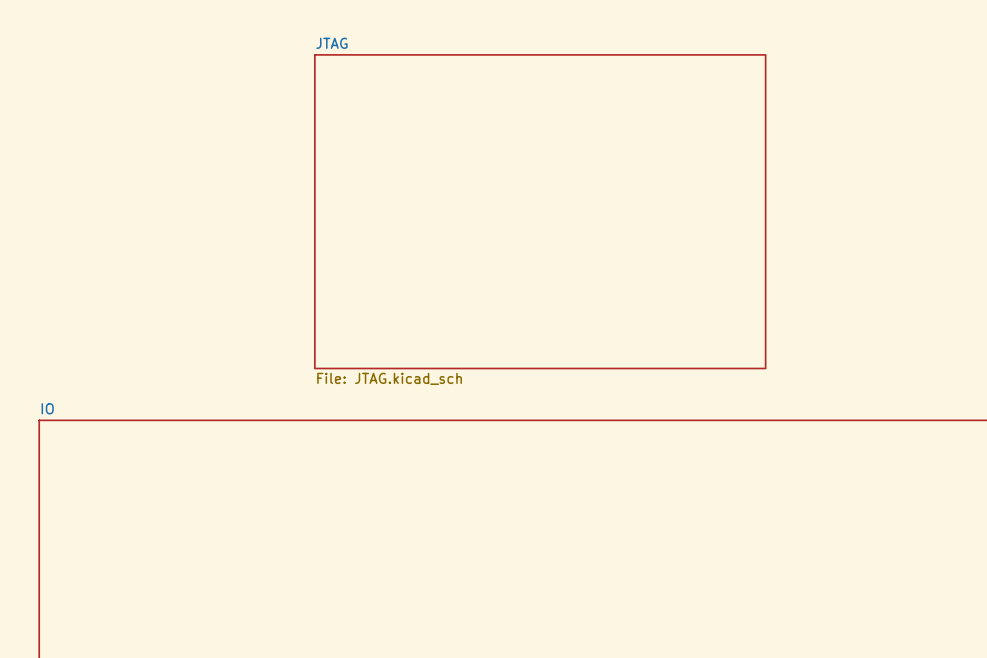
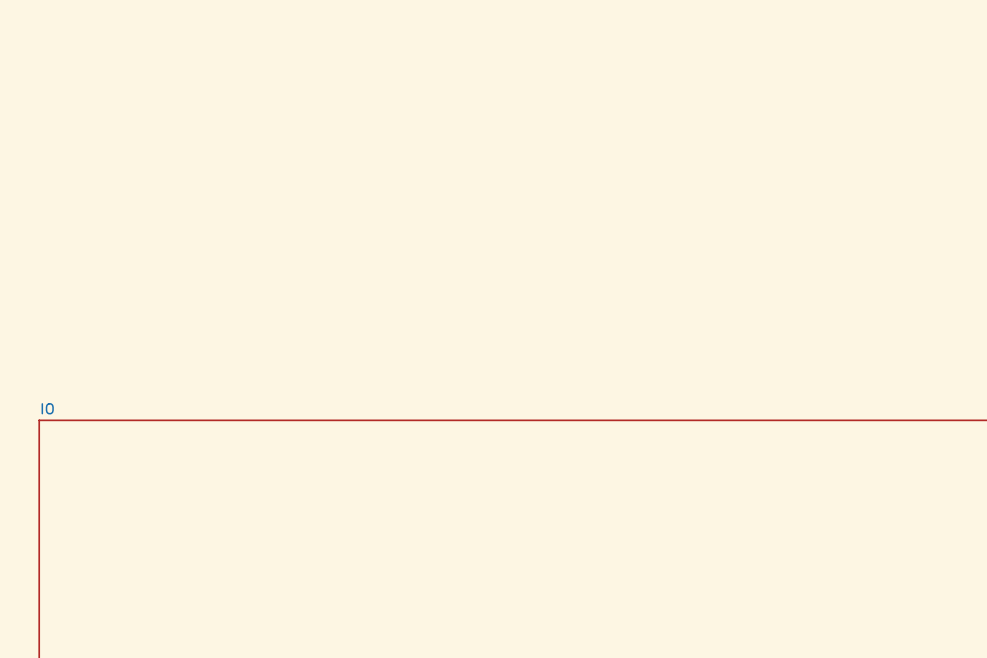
sheet JTAG: File: JTAG.kicad_sch (540, 211) -> none

